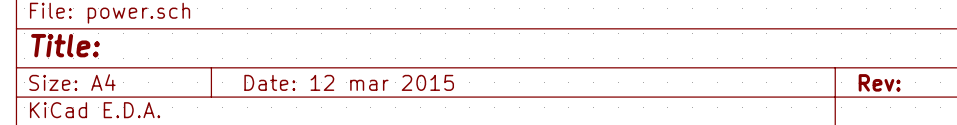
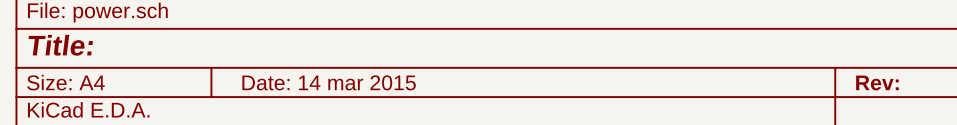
title block: Date: 12 mar 2015 (349, 82) -> Date: 14 mar 2015 (329, 82)

